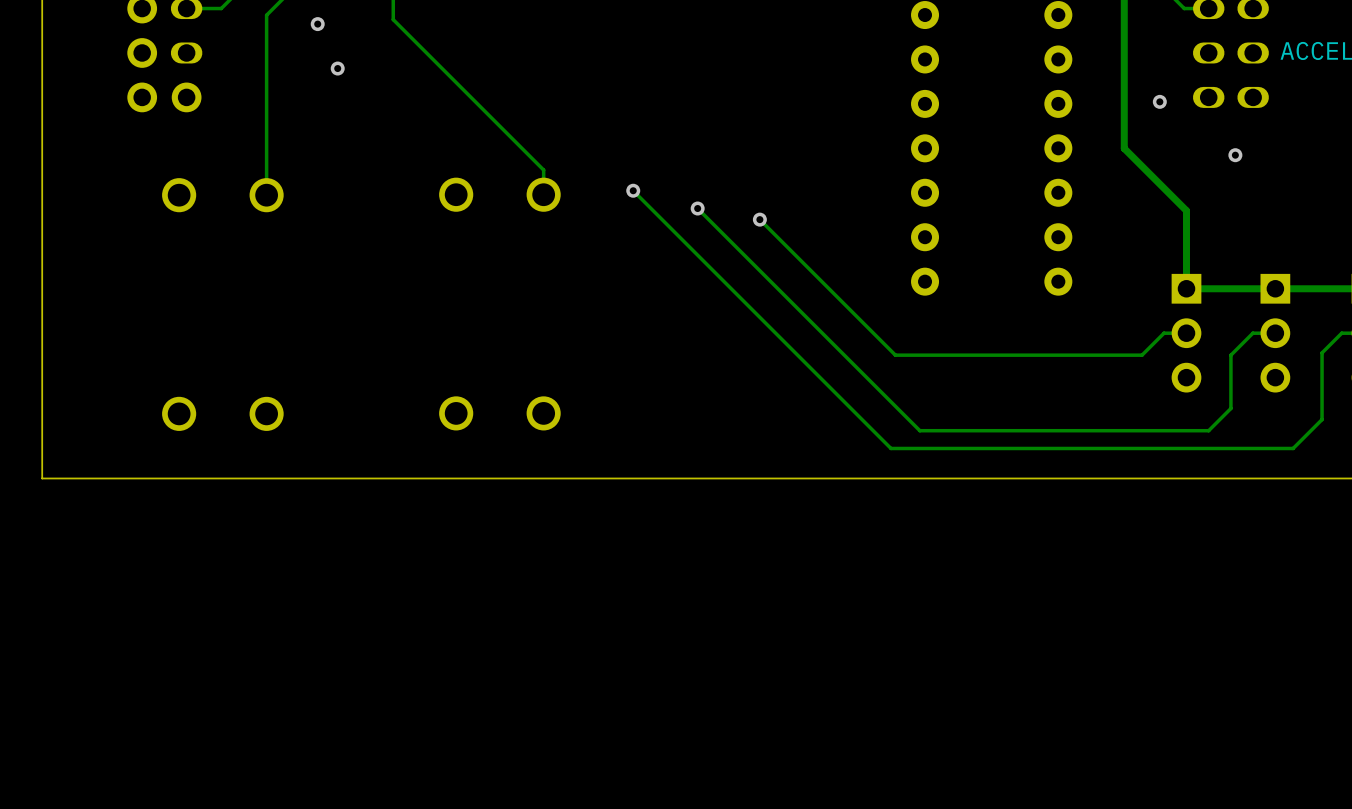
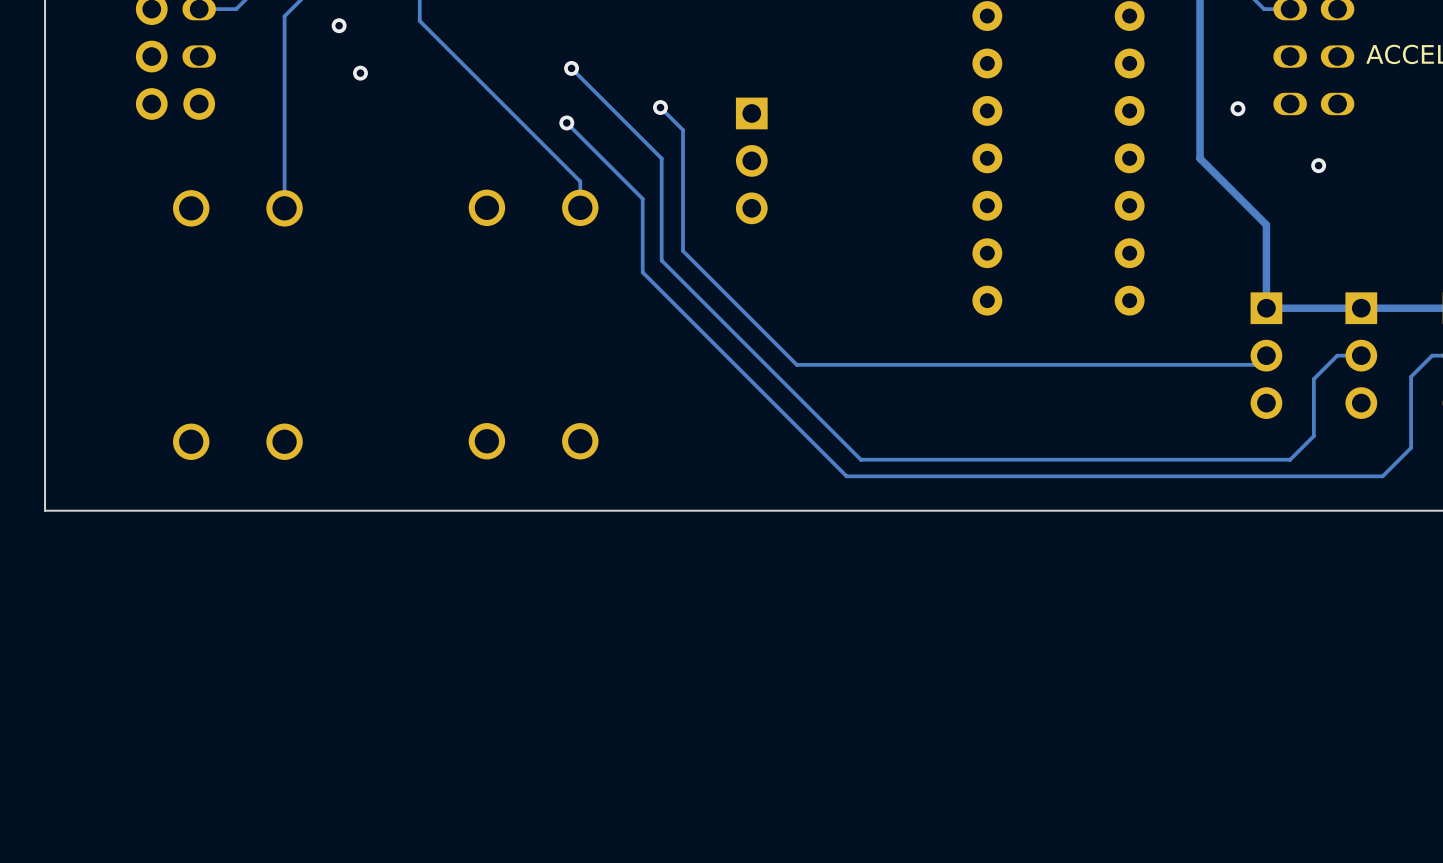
via: none -> (571, 68)
via: none -> (660, 107)
via: none -> (566, 122)
part: none -> (751, 160)
track: (633, 190) (890, 448) (1293, 448) (1295, 446) -> (566, 122) (642, 198) (642, 272) (846, 476) (1382, 476)
via: (633, 190) -> none
track: (697, 208) (919, 430) -> (571, 68) (661, 158) (661, 260) (860, 459) (981, 459)
via: (697, 208) -> none
track: (759, 219) (895, 355) (1142, 355) (1164, 333) (1186, 333) -> (660, 107) (683, 130) (683, 251) (796, 364) (1257, 364) (1266, 355)
via: (759, 219) -> none

